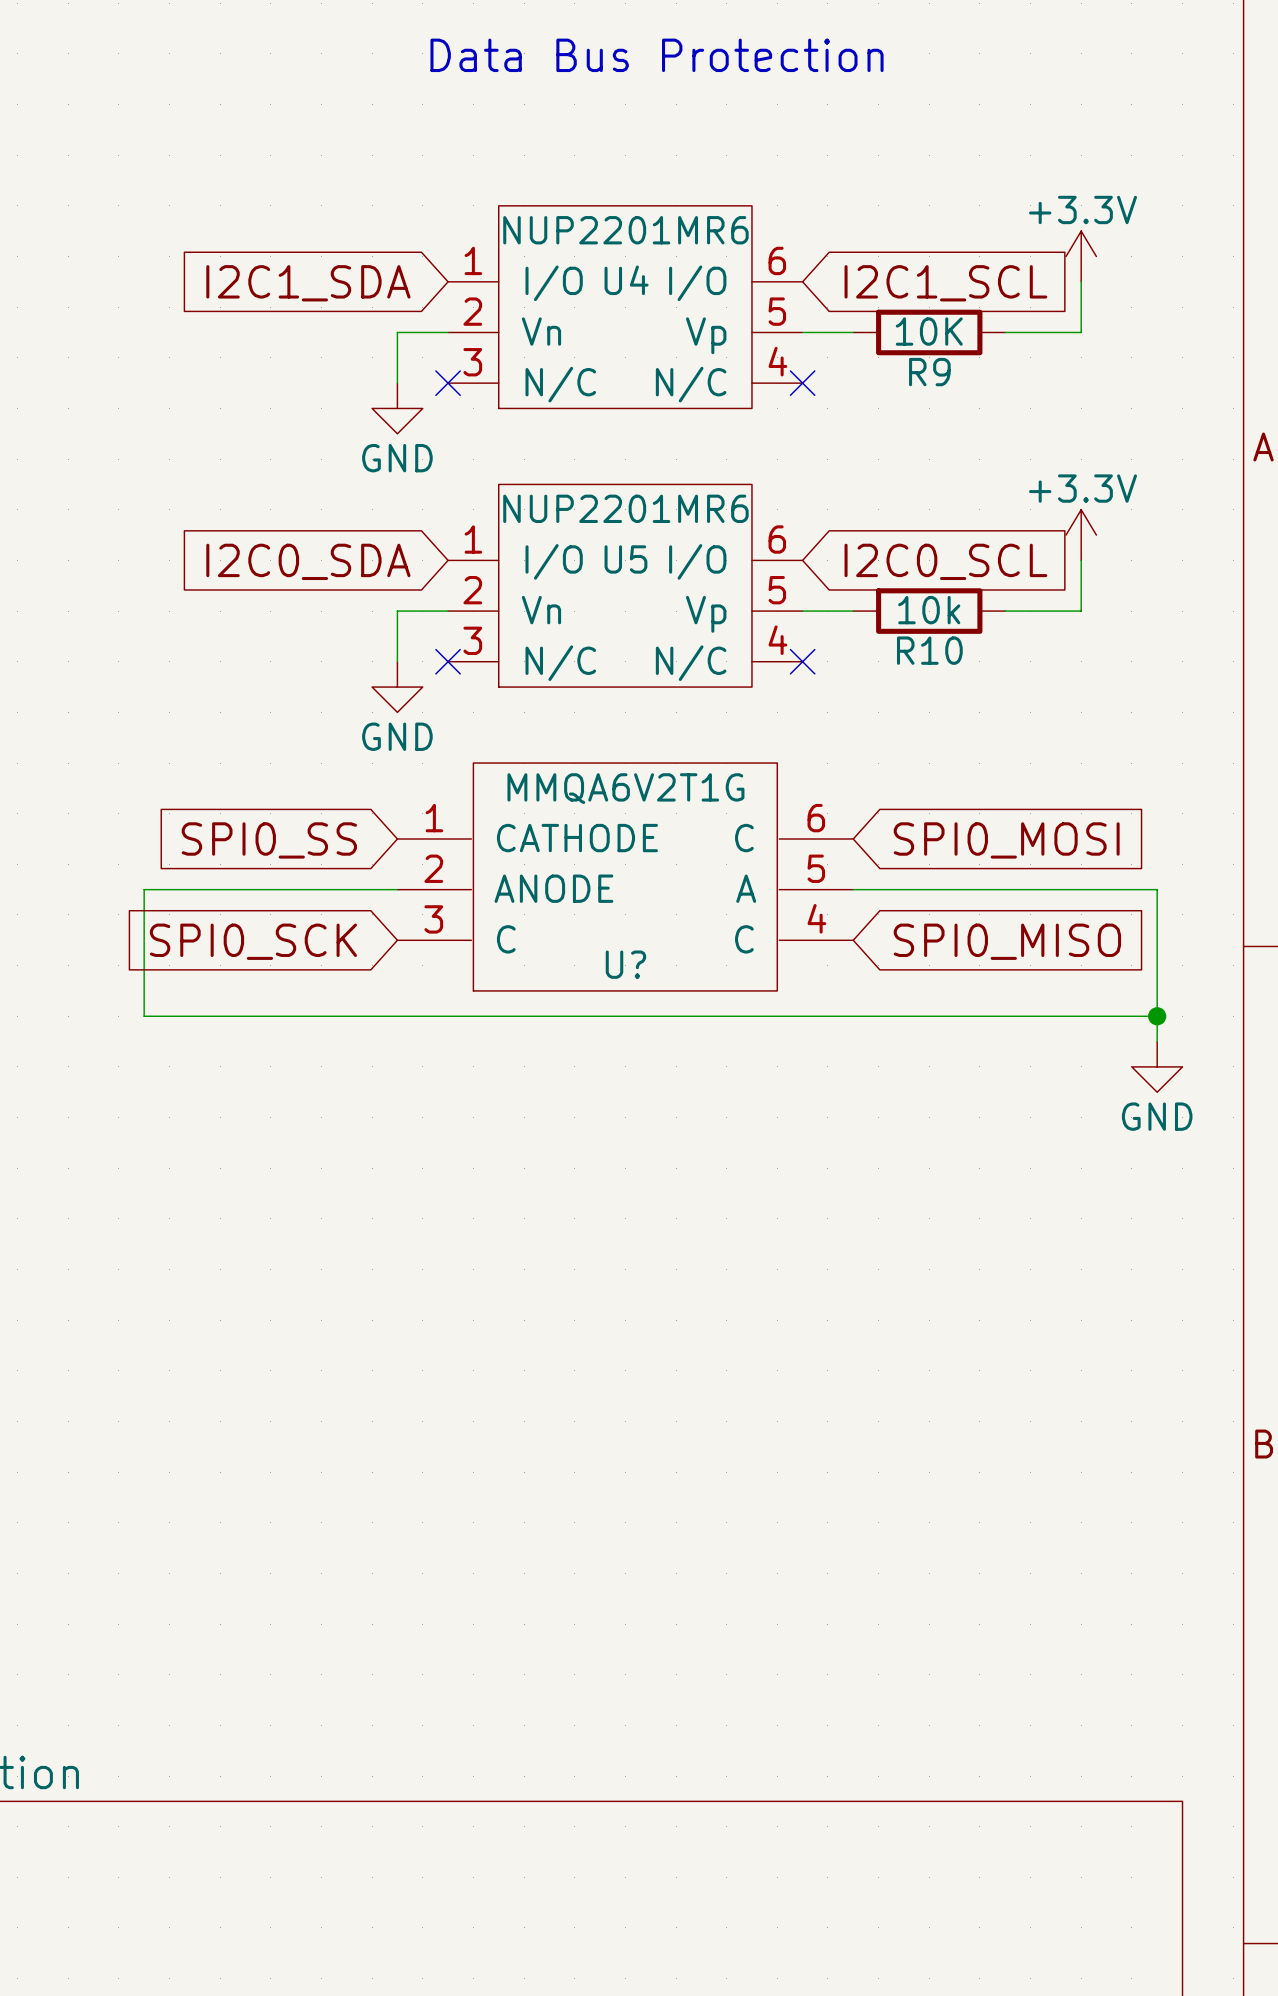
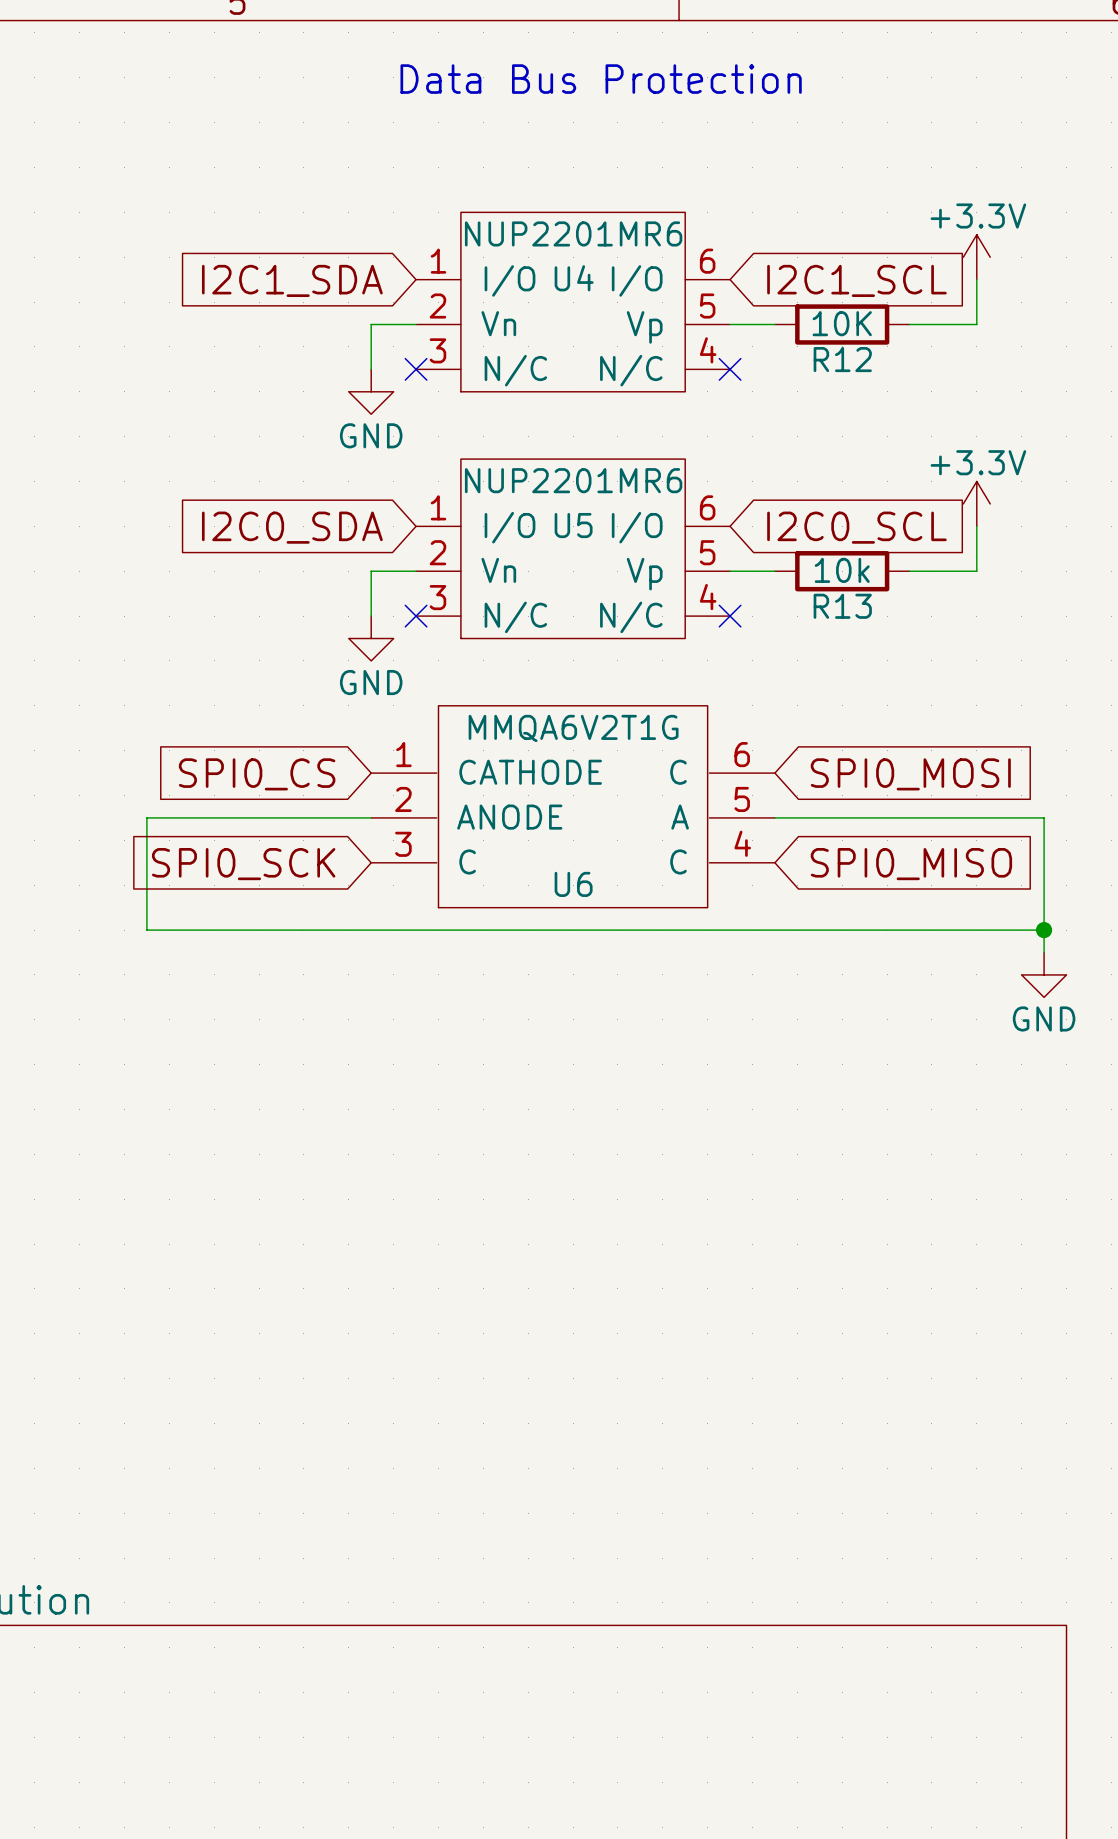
R9 name: R9 (929, 372) -> R12 (842, 359)
R10 name: R10 (929, 650) -> R13 (842, 606)
global label: SPI0_SS (269, 840) -> SPI0_CS (257, 774)
U? name: U? (625, 964) -> U6 (573, 884)

